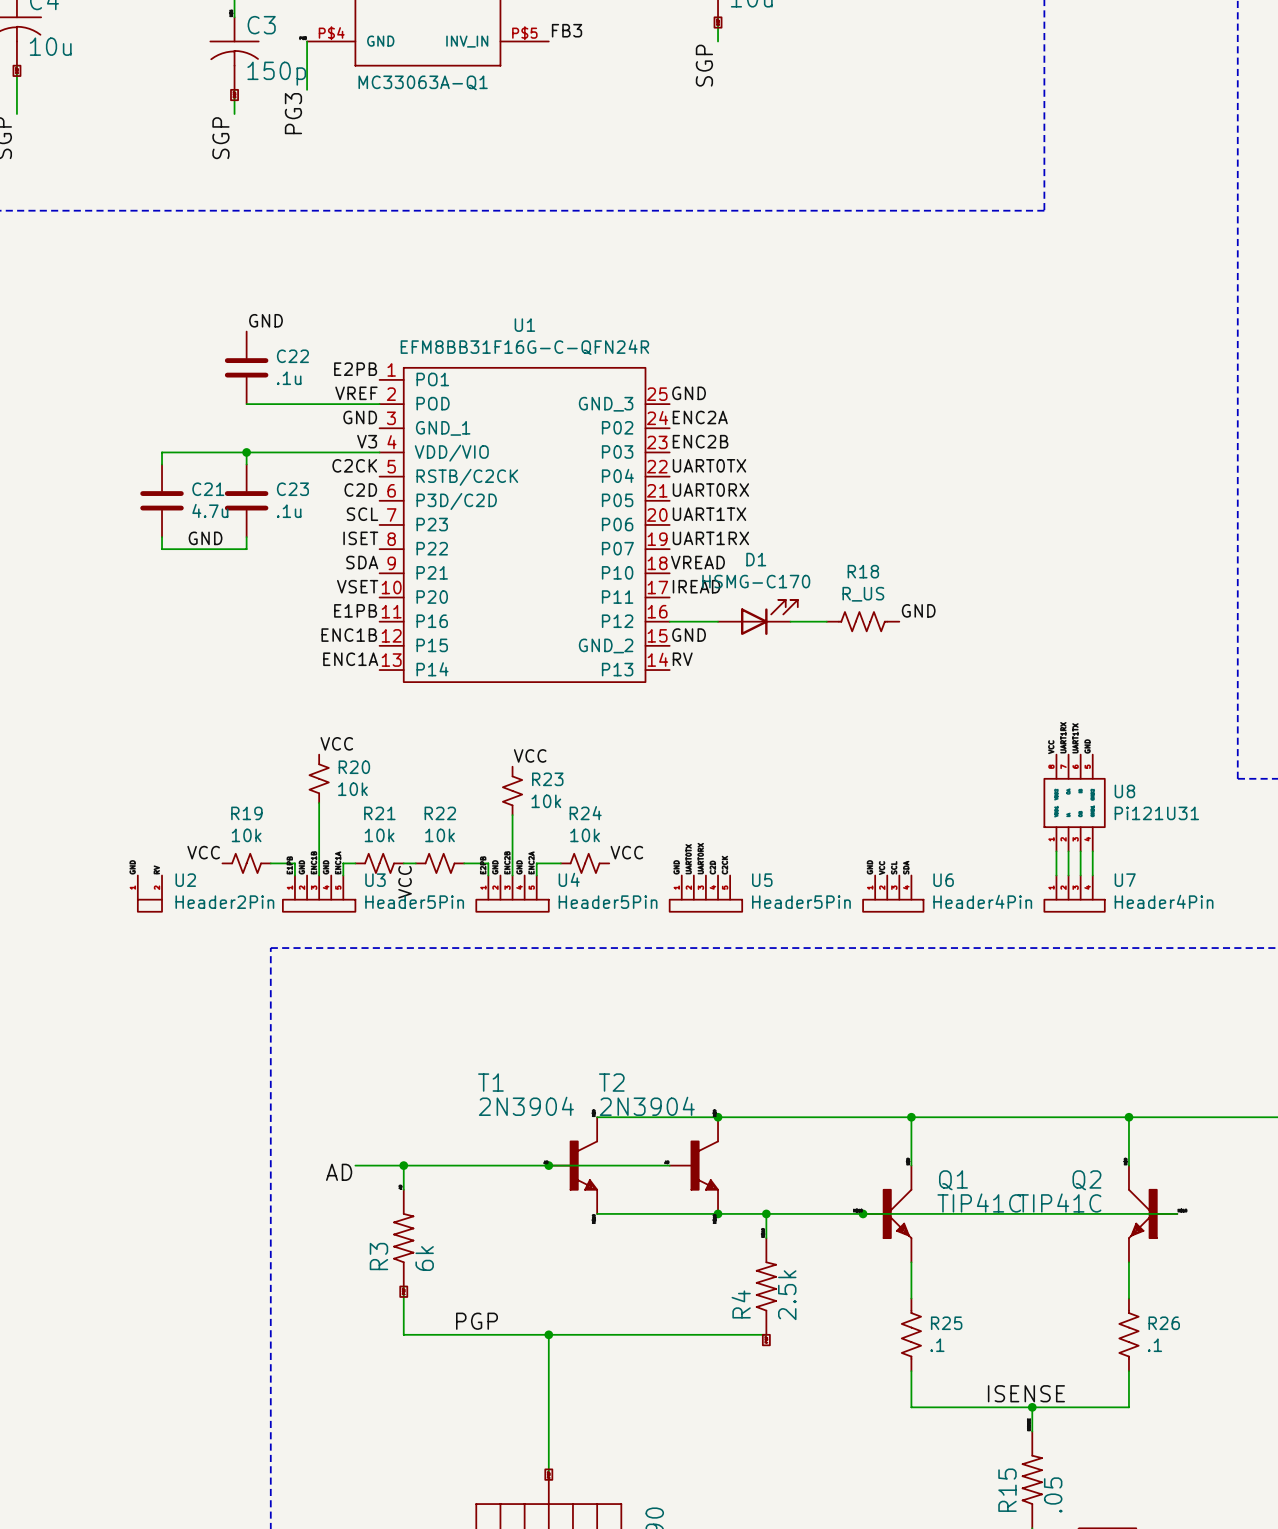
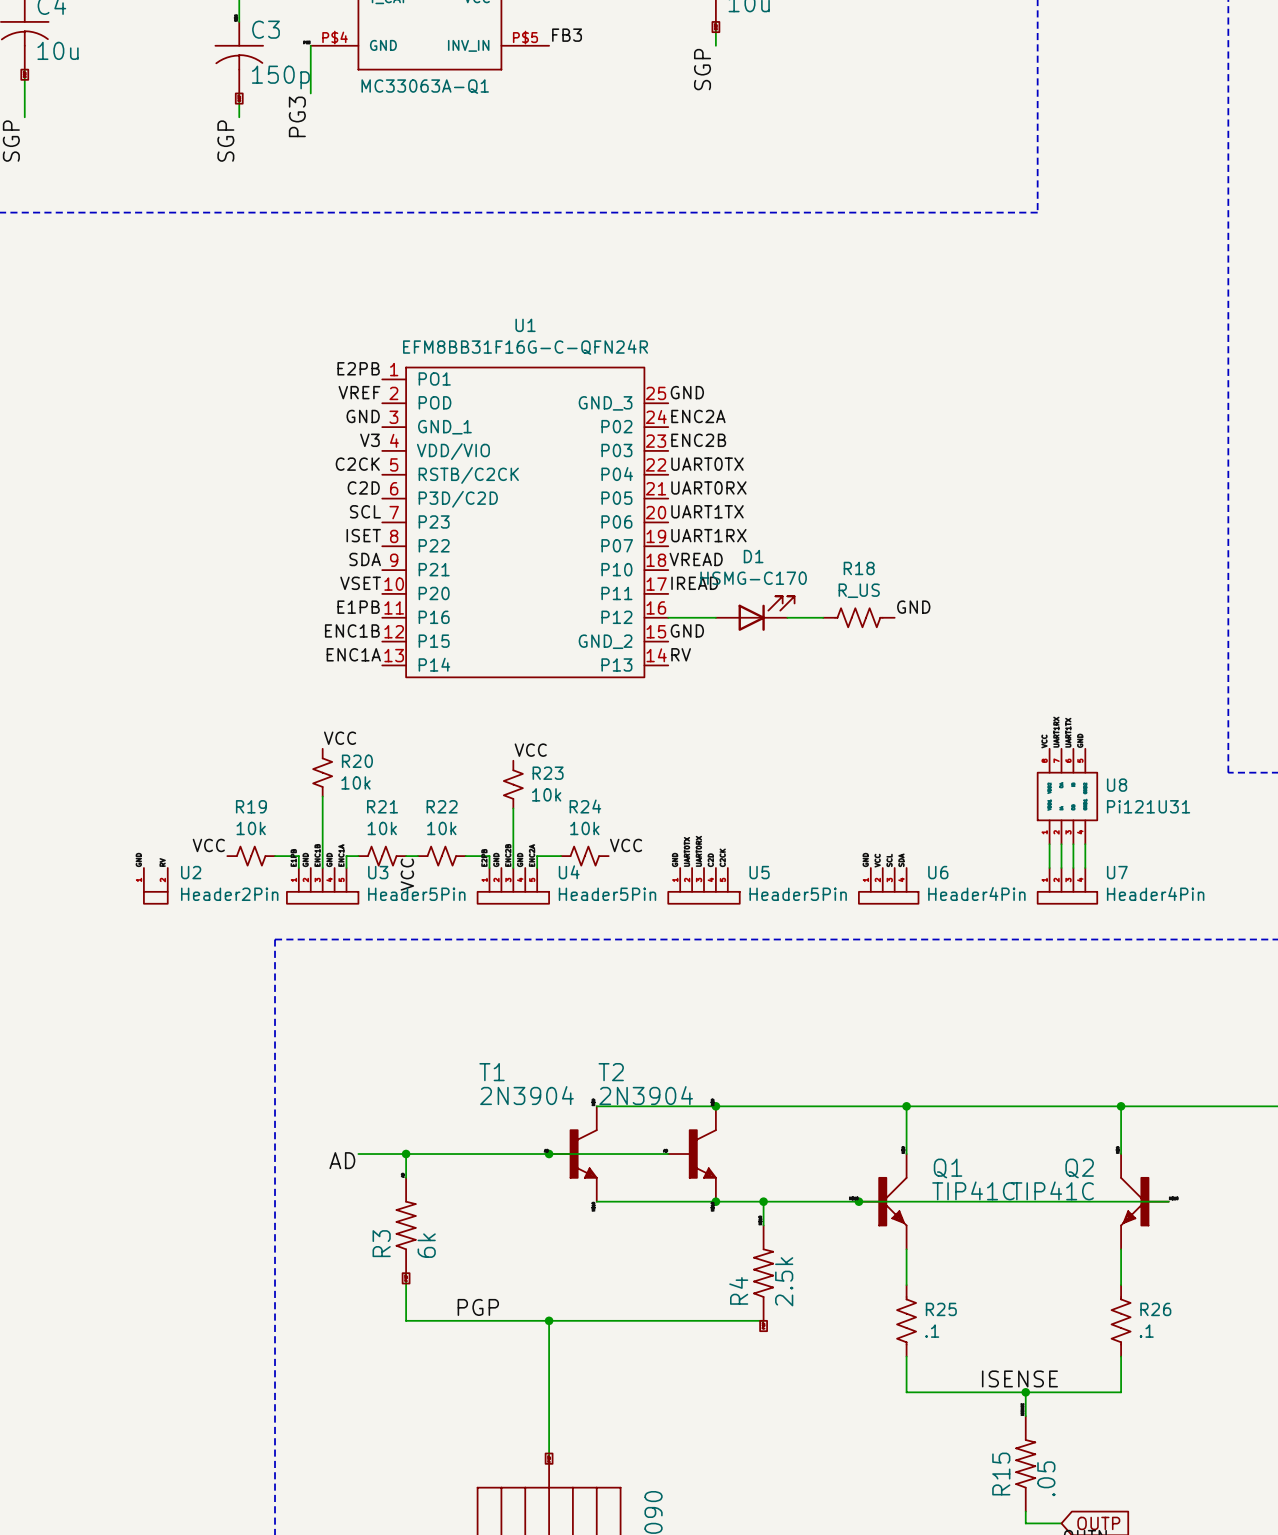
label: GND (265, 320) -> none
C22: .1u (246, 367) -> none
wire: (246, 404) (379, 404) -> none
wire: (246, 452) (246, 464) -> none
junction: (246, 452) -> none
wire: (379, 452) (162, 452) (162, 464) -> none
C21: 4.7u (162, 500) -> none
C23: .1u (246, 500) -> none
wire: (162, 537) (162, 549) (246, 549) (246, 537) -> none
label: GND (205, 538) -> none

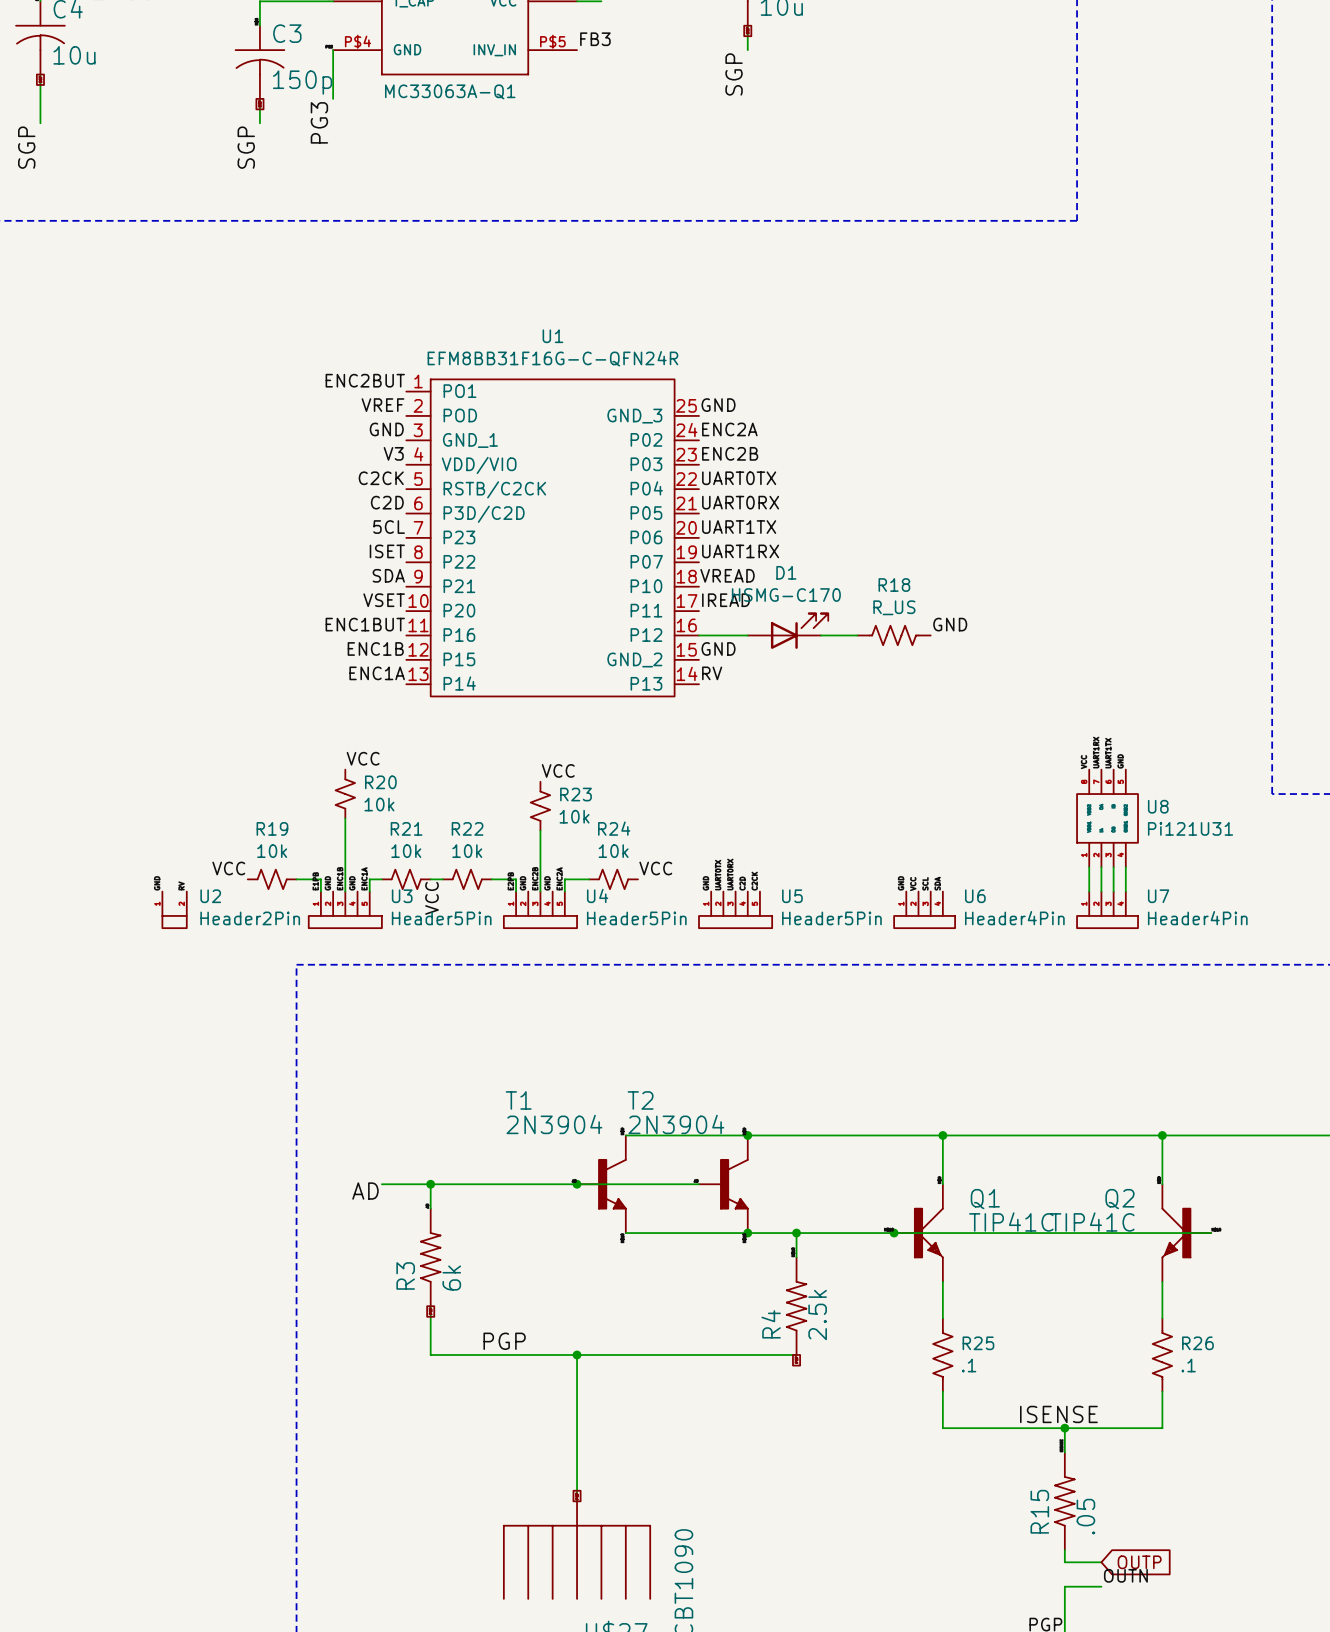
label: E2PB (358, 368) -> ENC2BUT (365, 380)
label: SCL (365, 511) -> 5CL (389, 527)
label: E1PB (358, 607) -> ENC1BUT (365, 624)

